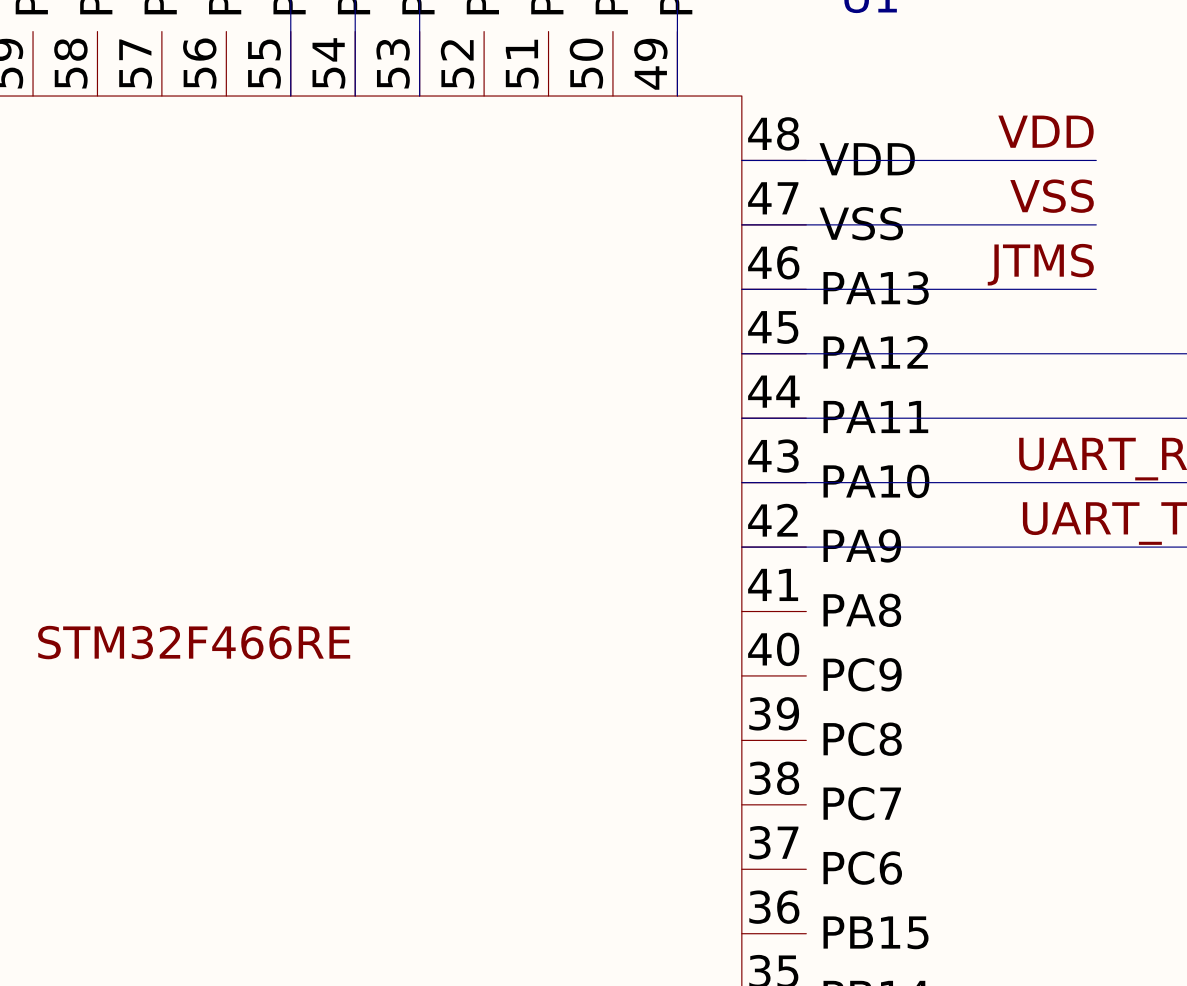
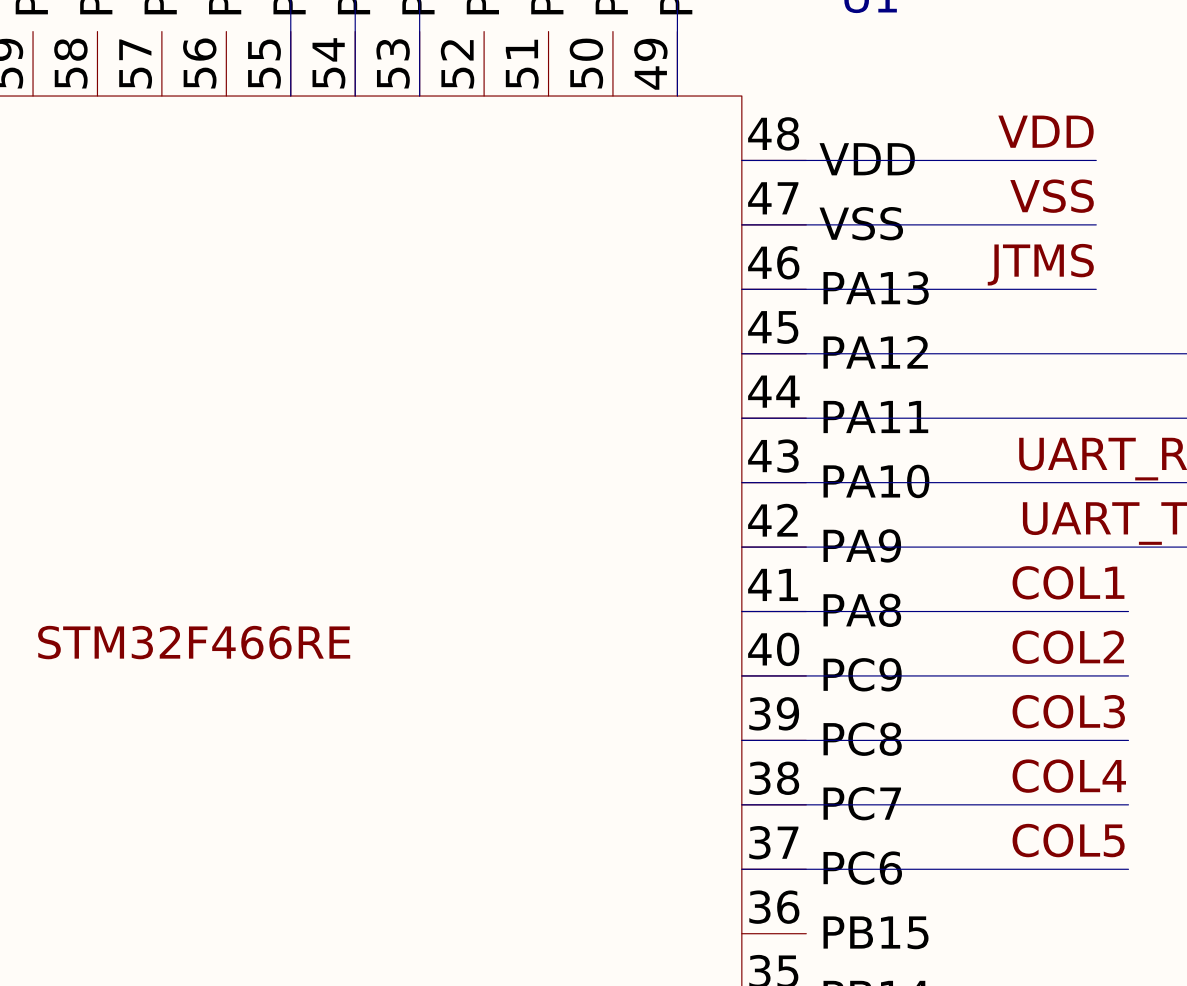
label: none -> COL1 (1068, 582)
wire: none -> (741, 611) (1128, 611)
label: none -> COL2 (1068, 647)
wire: none -> (741, 675) (1128, 675)
label: none -> COL3 (1068, 711)
wire: none -> (741, 740) (1128, 740)
label: none -> COL4 (1069, 776)
wire: none -> (741, 804) (1128, 804)
label: none -> COL5 (1068, 840)
wire: none -> (741, 869) (1128, 869)

